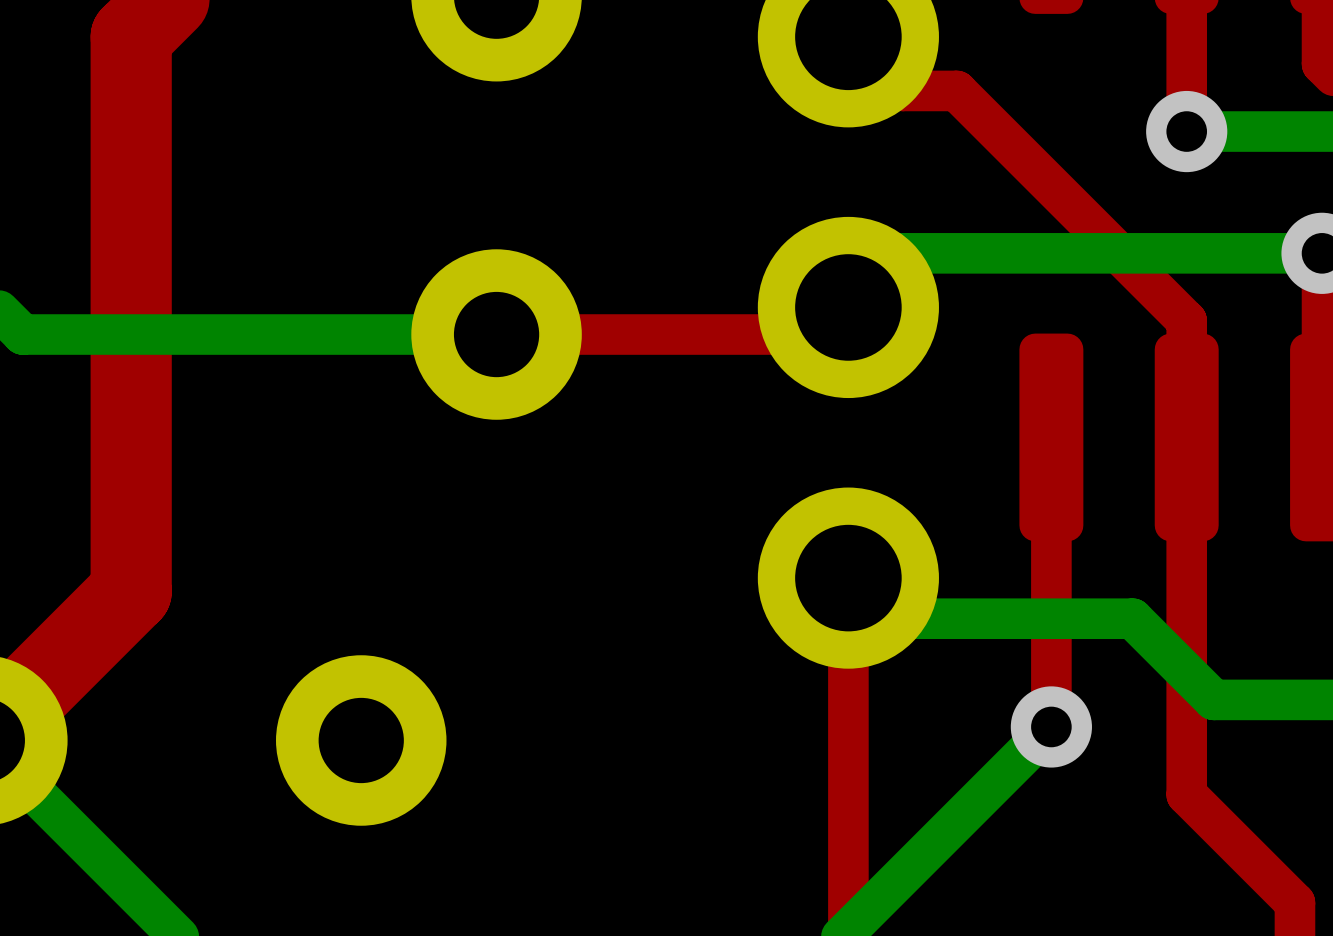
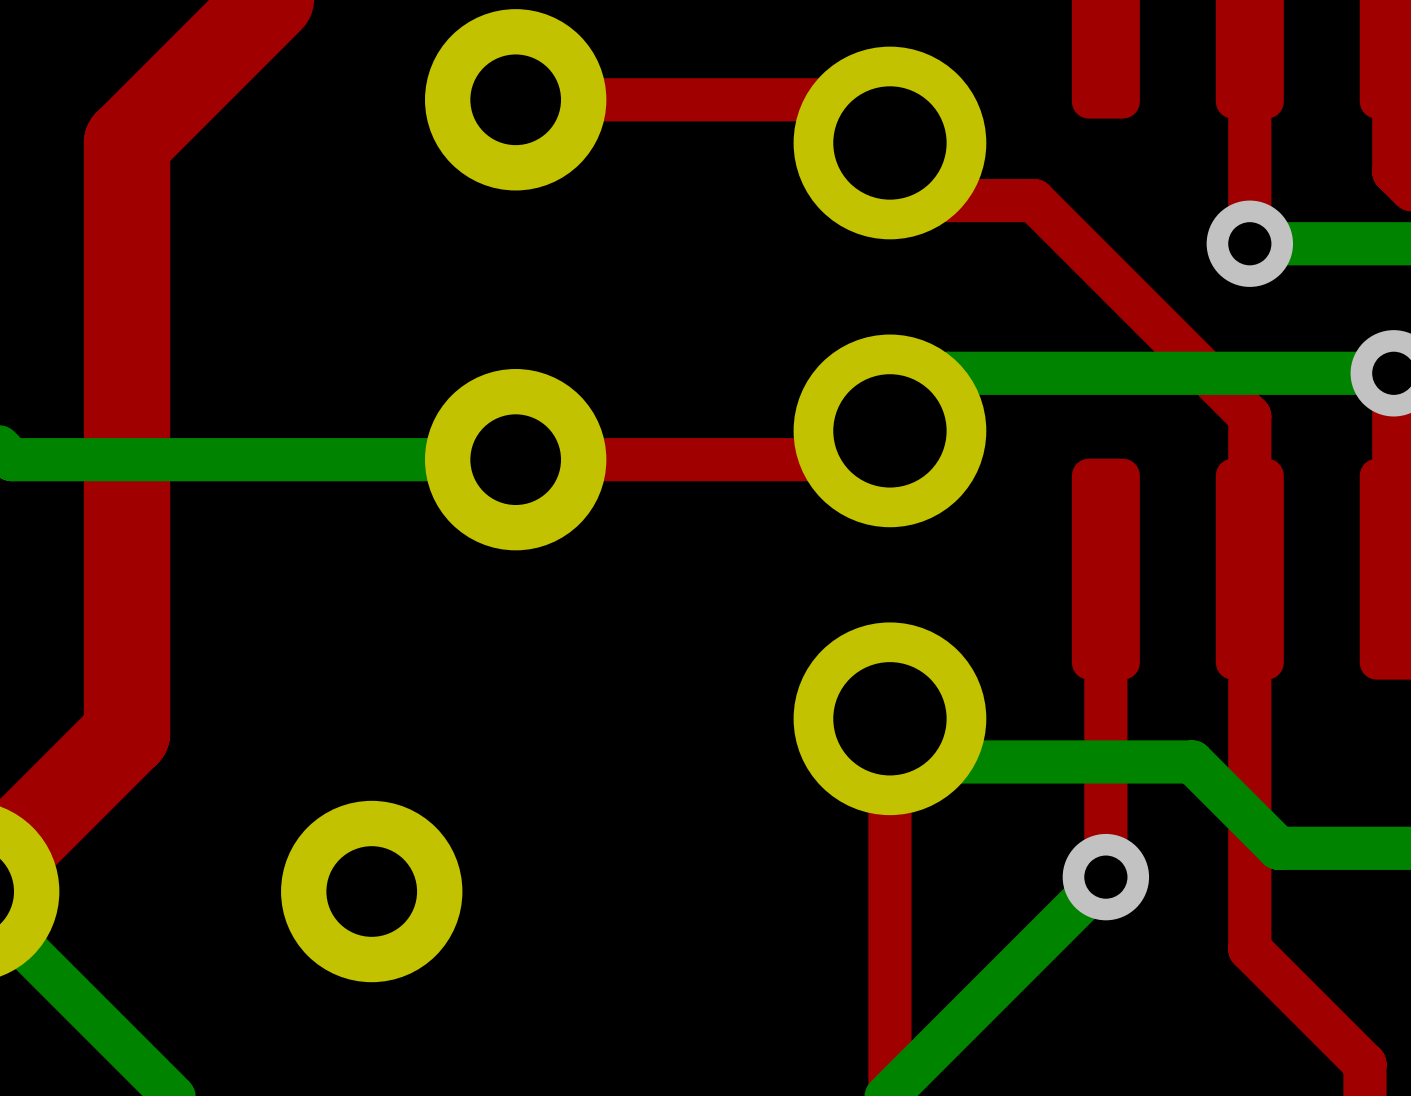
top track: (956, 90) (1186, 320) -> (1005, 200) (1033, 200) (1249, 416) (1249, 445)

